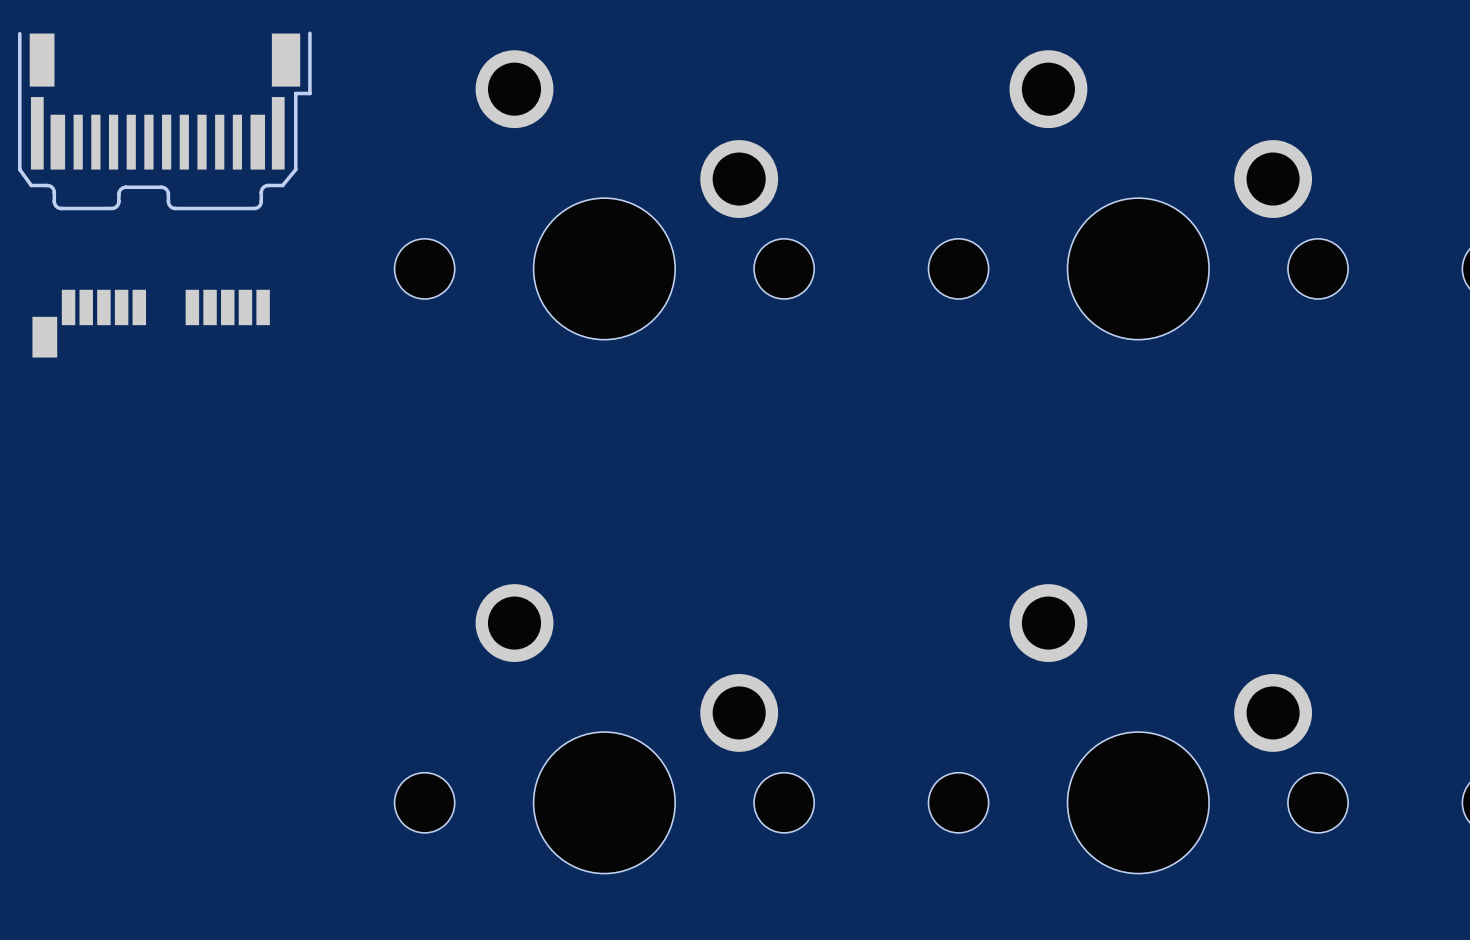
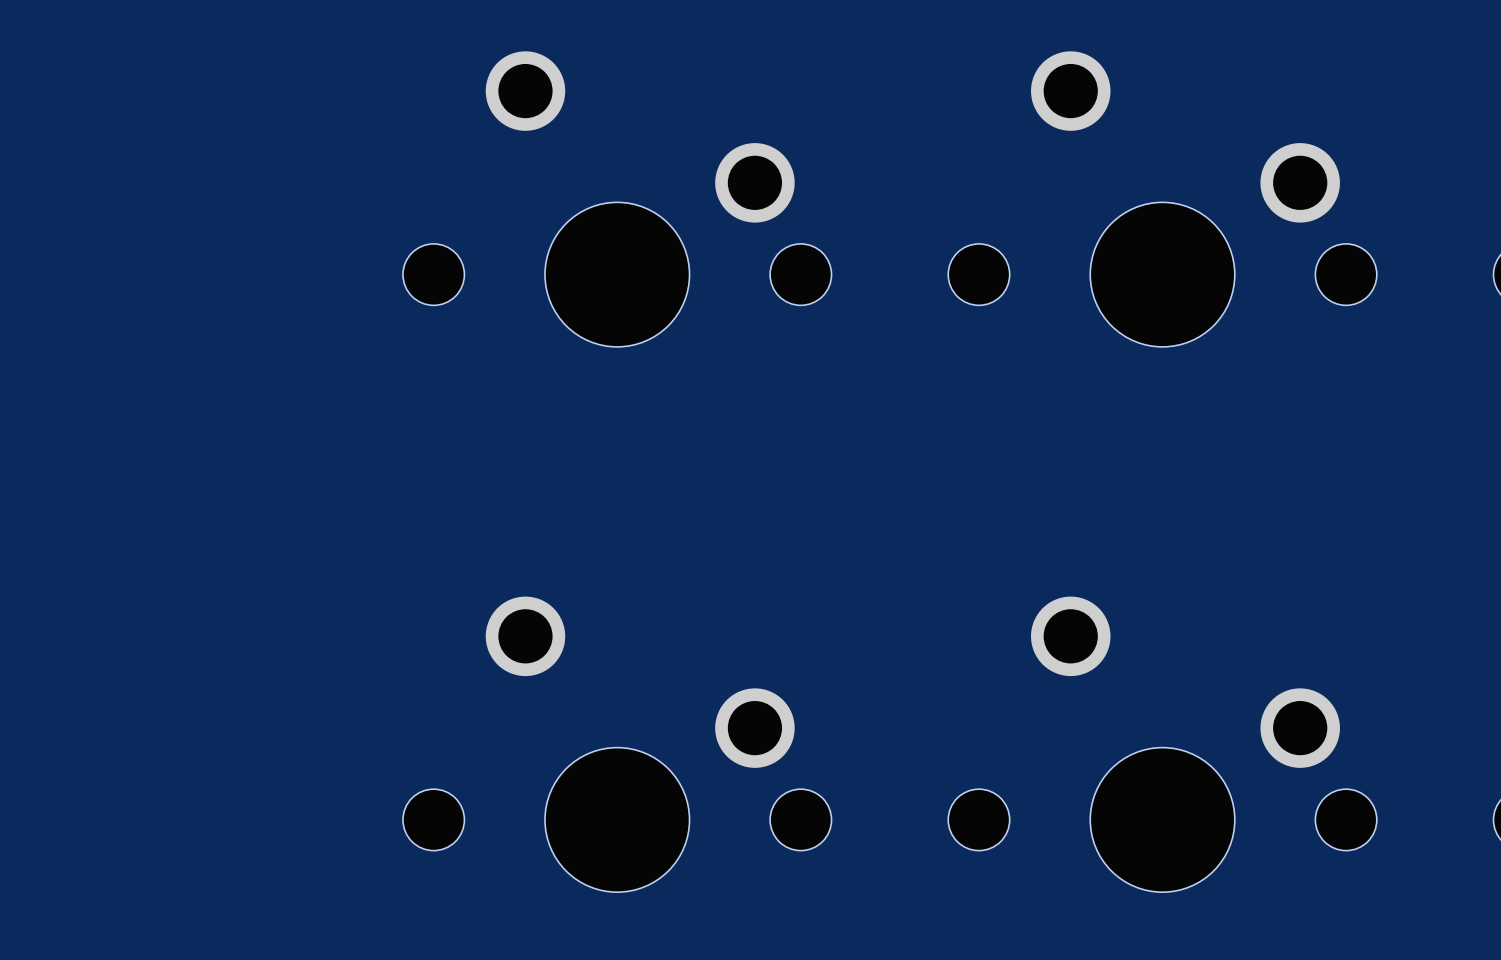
part: (164, 120) -> none
part: (151, 323) -> none

